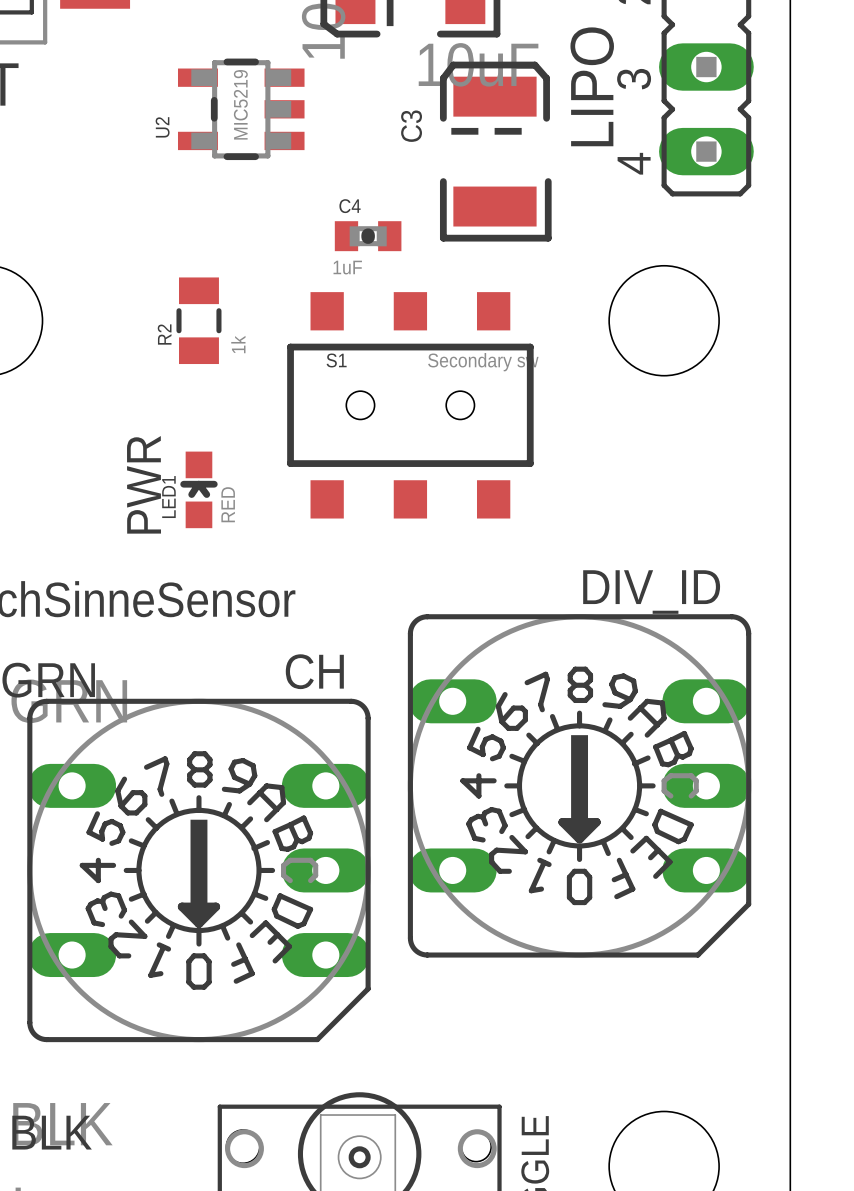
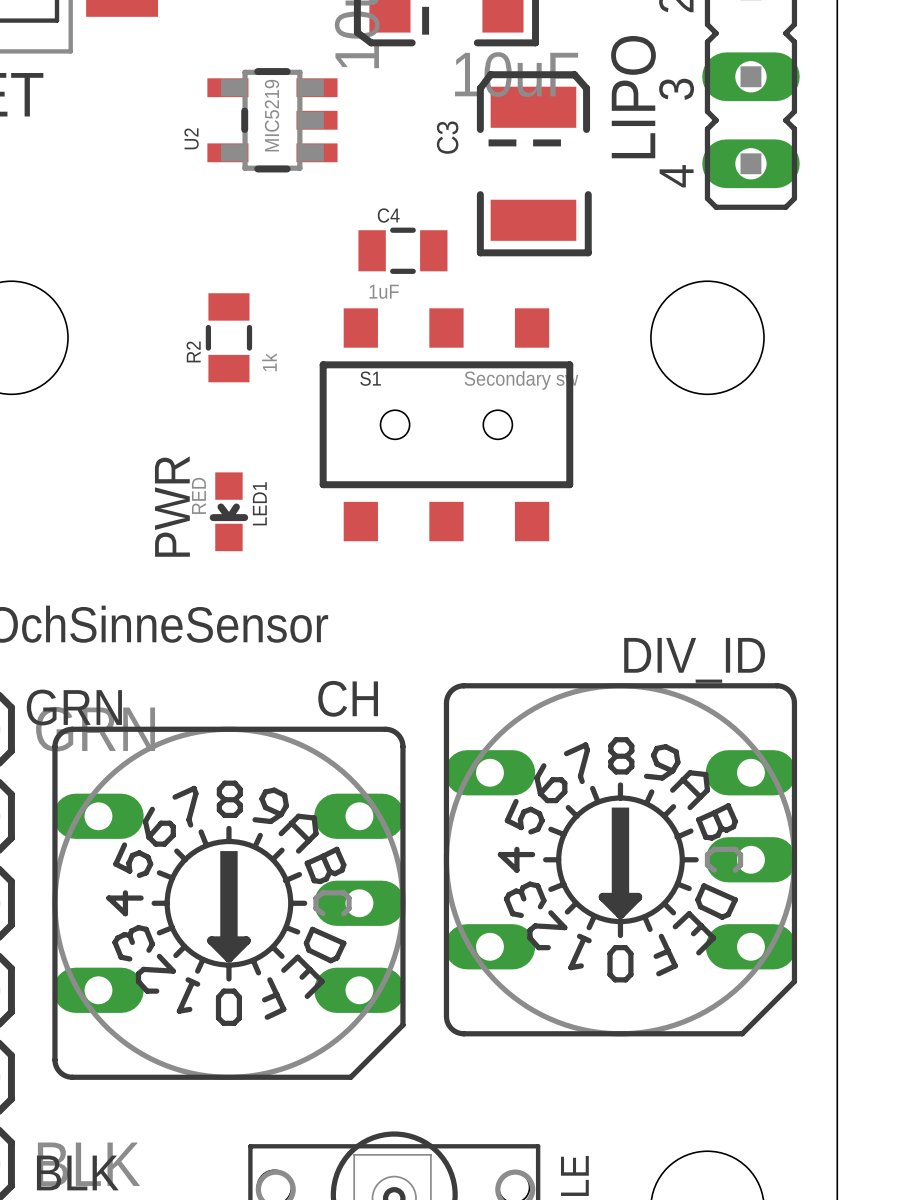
C4 footprint: [334, 221, 402, 252] -> [358, 227, 448, 274]
LED1 rotation: 0° (198, 489) -> 180° (228, 511)
DIV_ID position: (579, 785) -> (620, 859)

